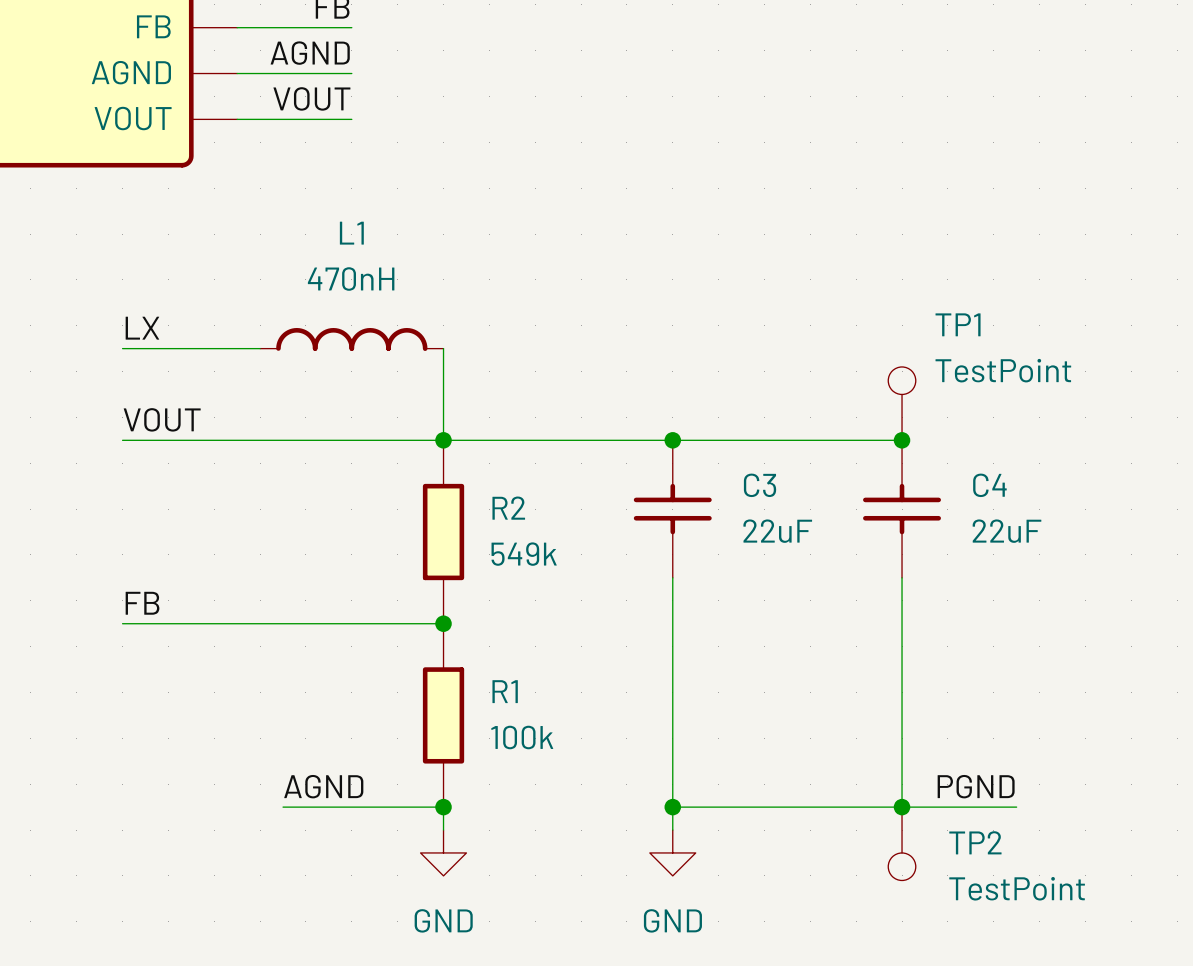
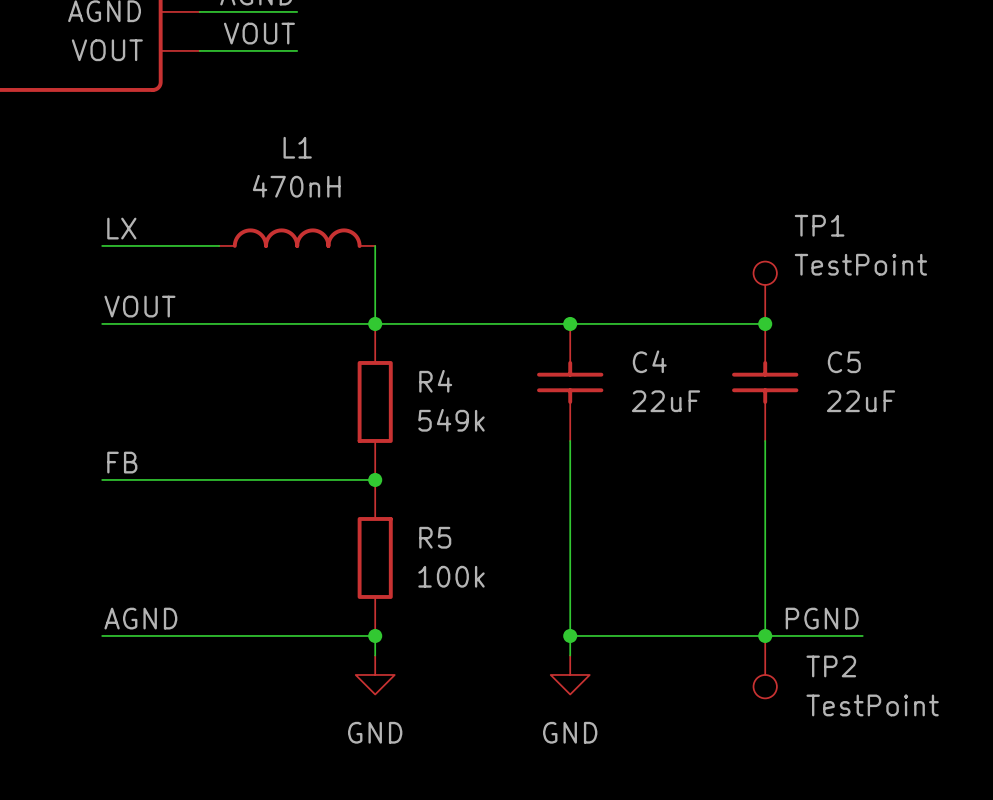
C3 name: C3 (760, 485) -> C4 (649, 361)
C4 name: C4 (989, 485) -> C5 (844, 362)
R2 name: R2 (508, 508) -> R4 (435, 381)
R1 name: R1 (505, 691) -> R5 (435, 537)
label position: AGND (323, 786) -> AGND (140, 618)
wire: none -> (102, 635) (238, 635)

